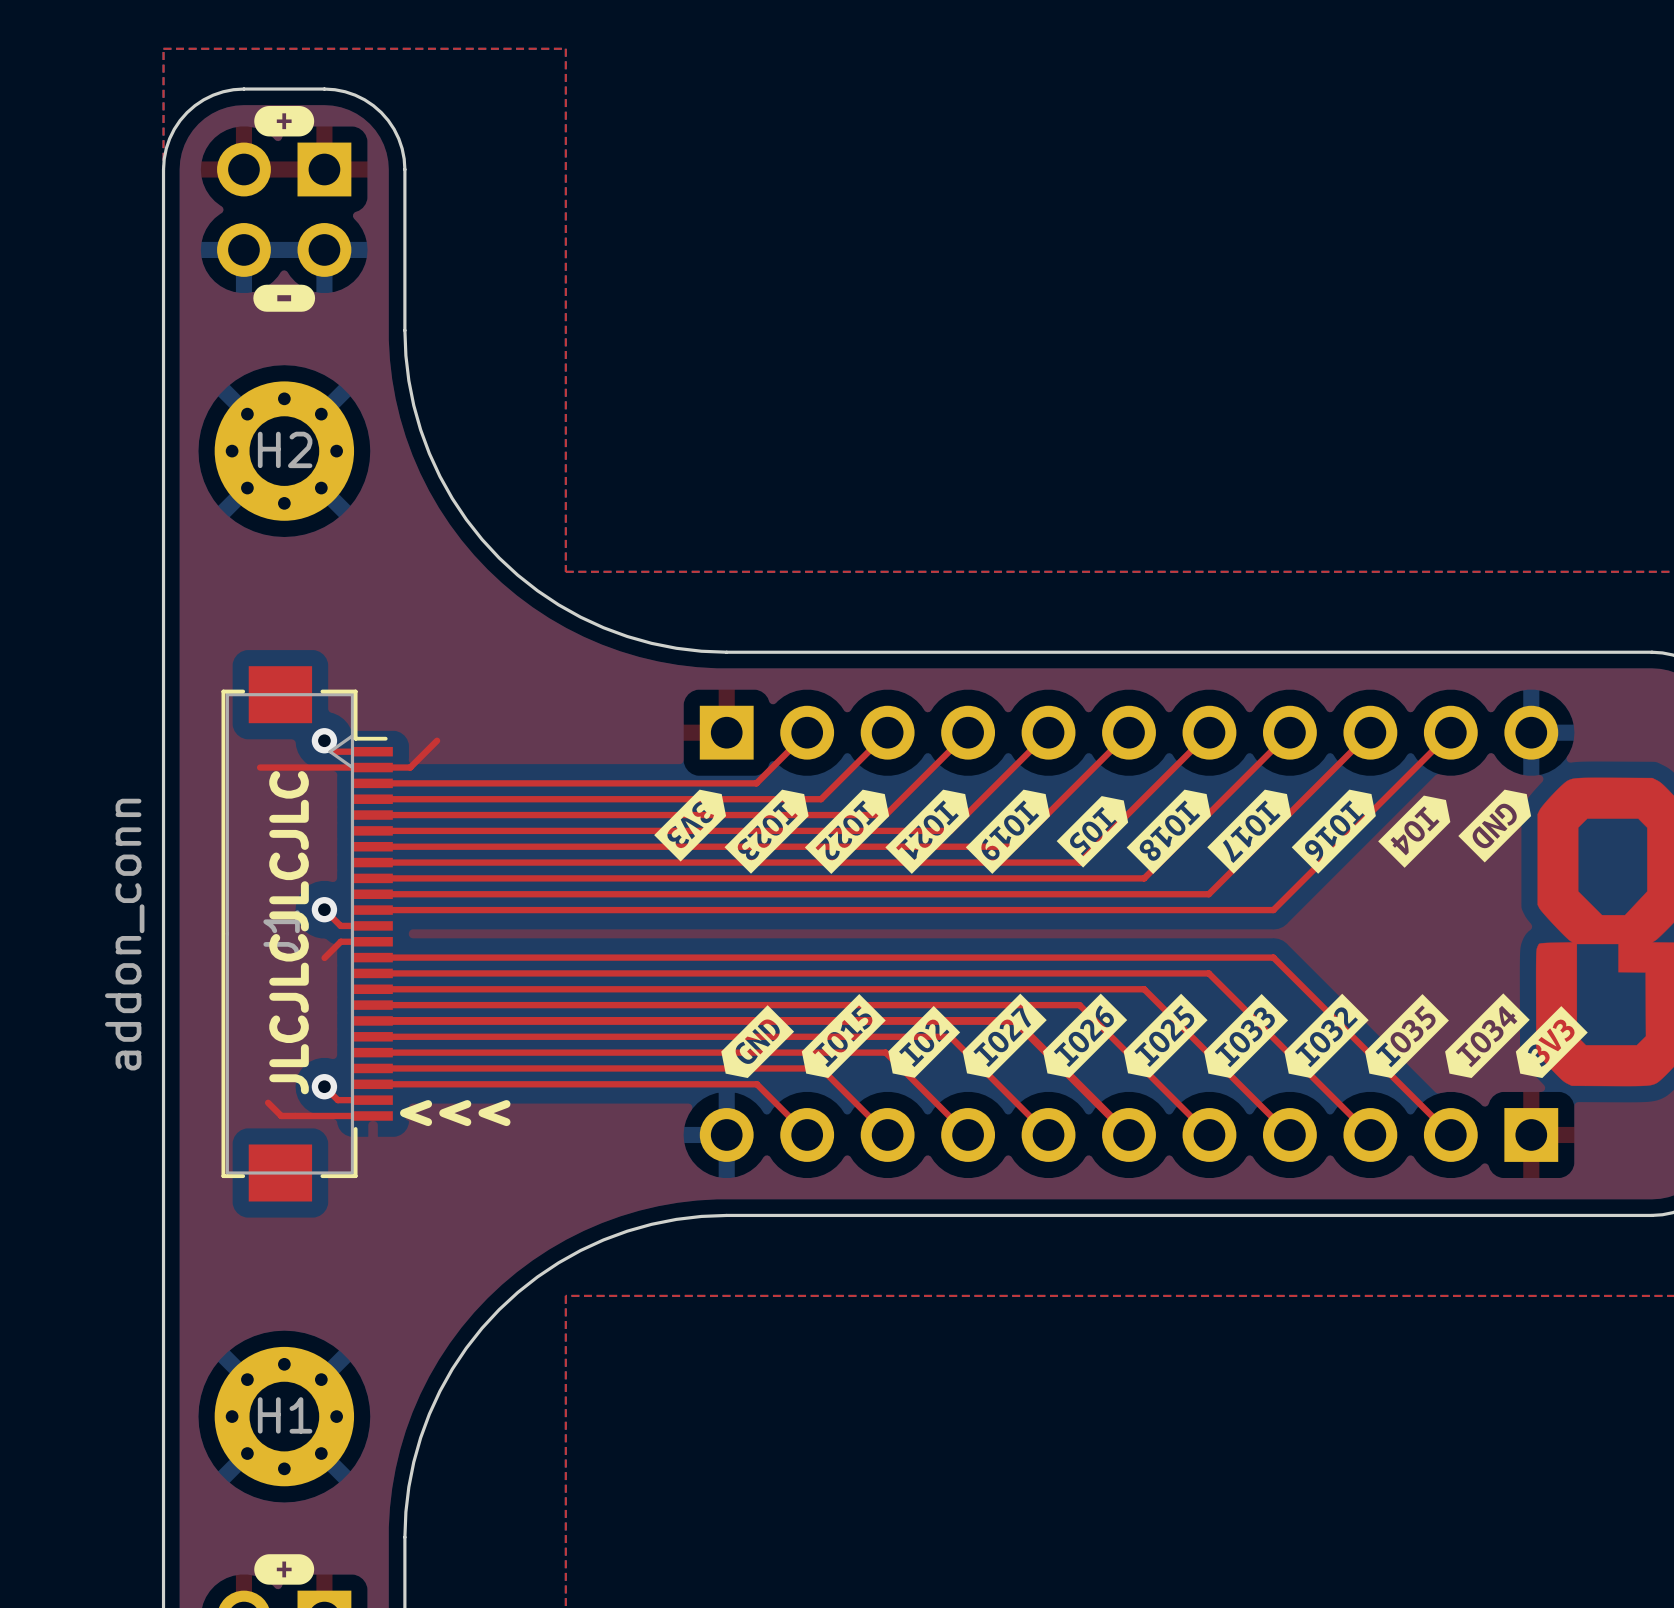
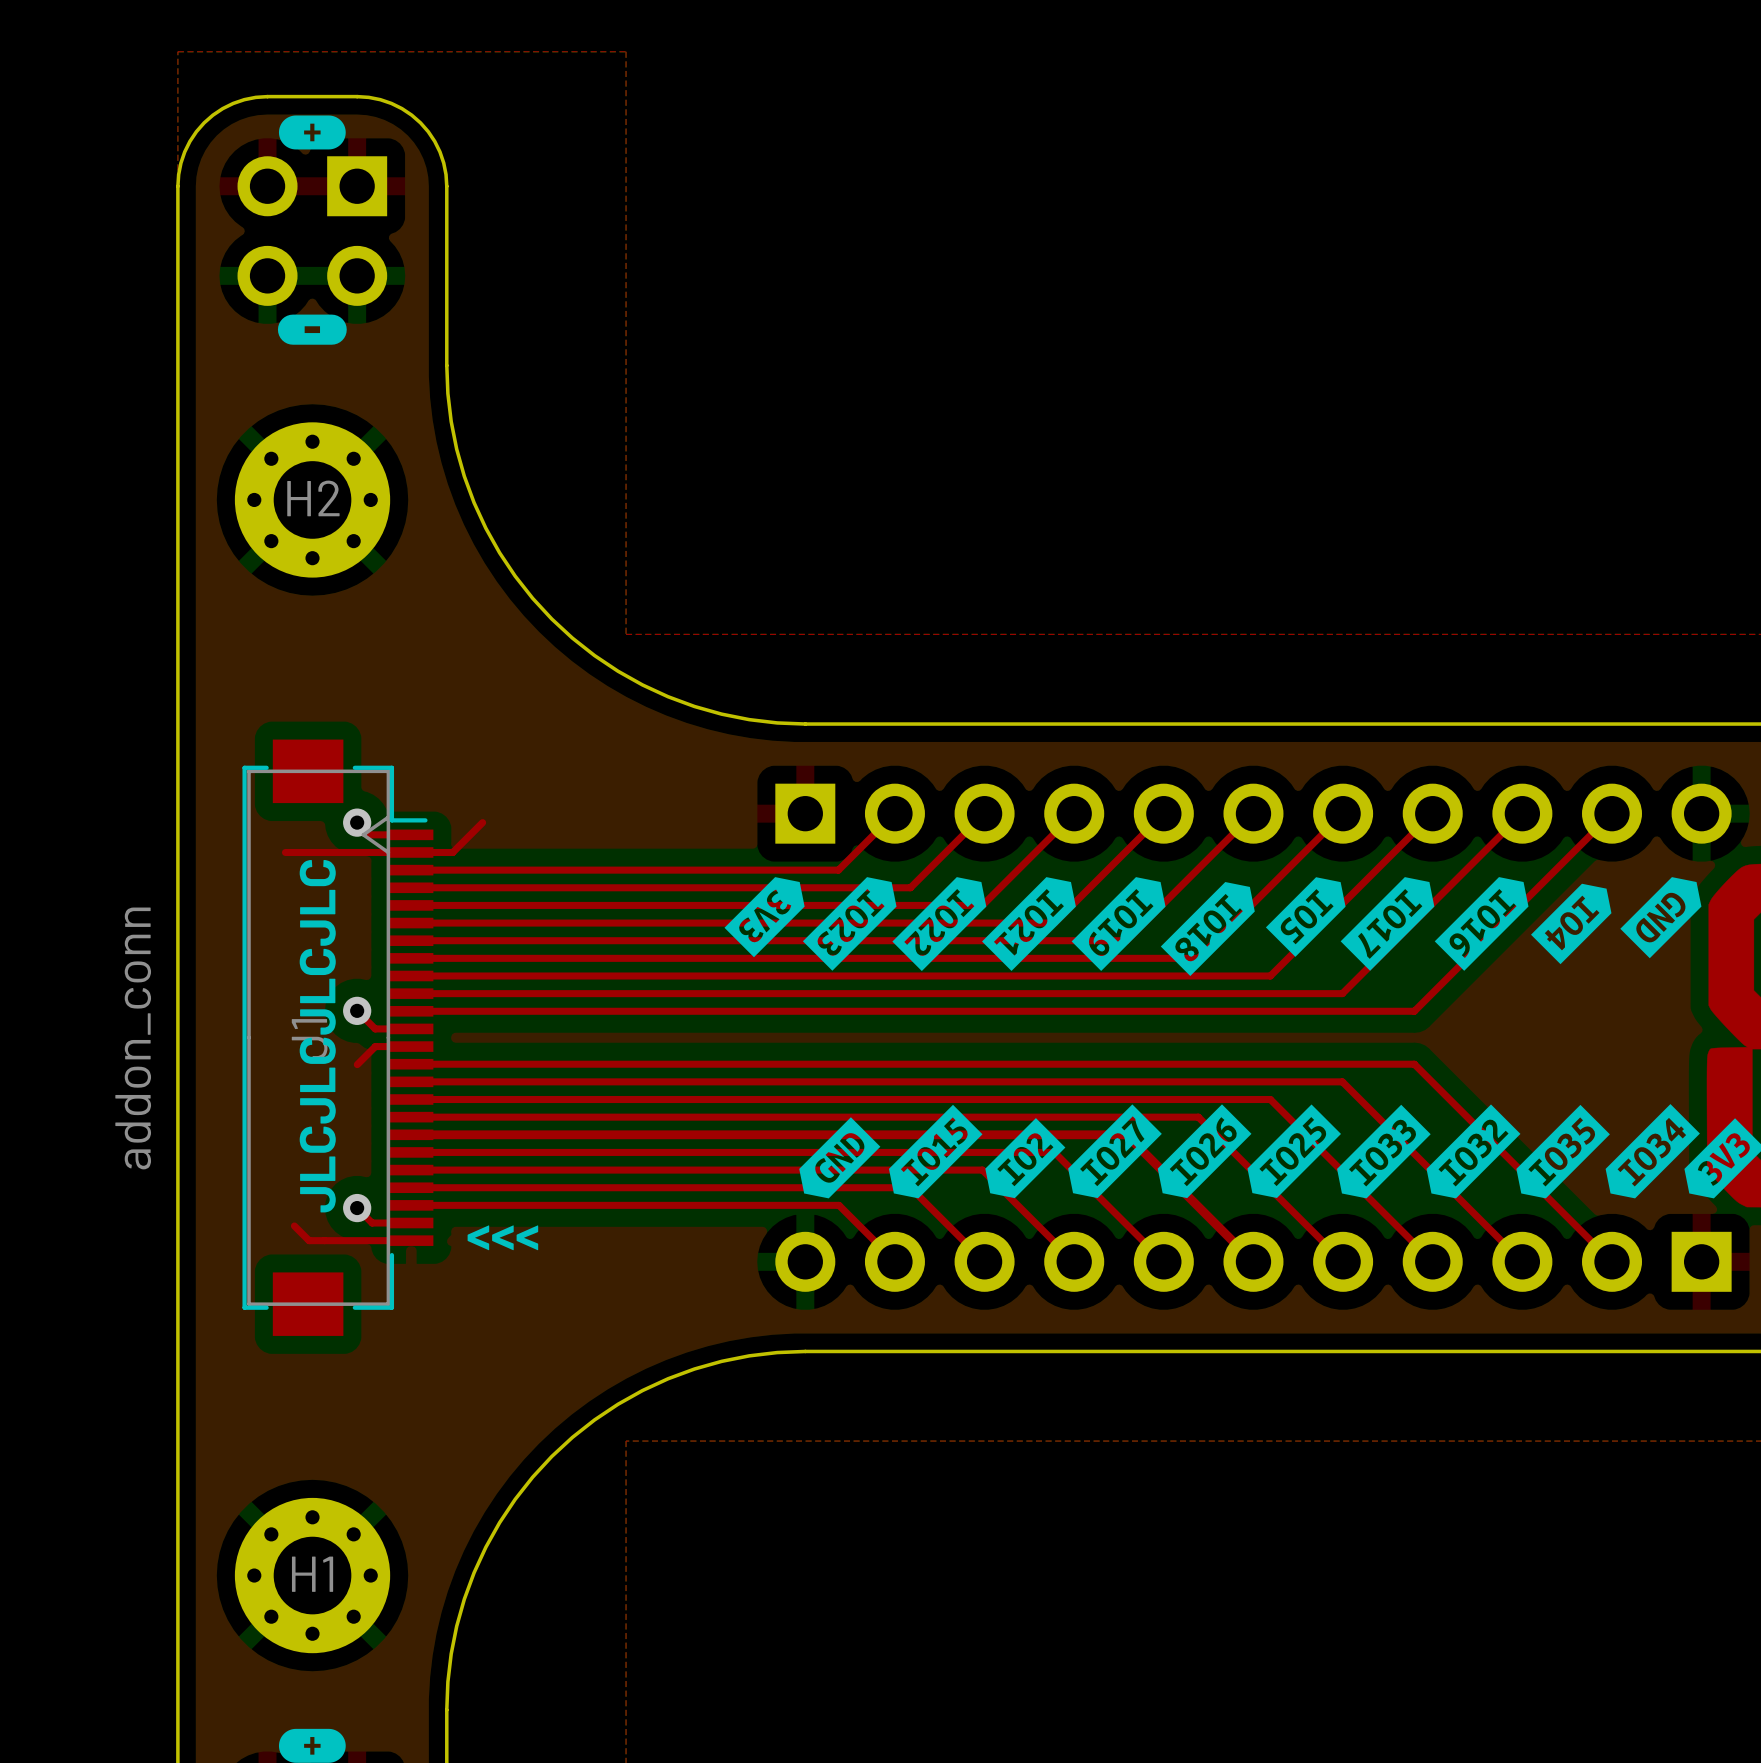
drawing position: (1092, 831) -> (1305, 917)
drawing position: (1168, 831) -> (1207, 929)

